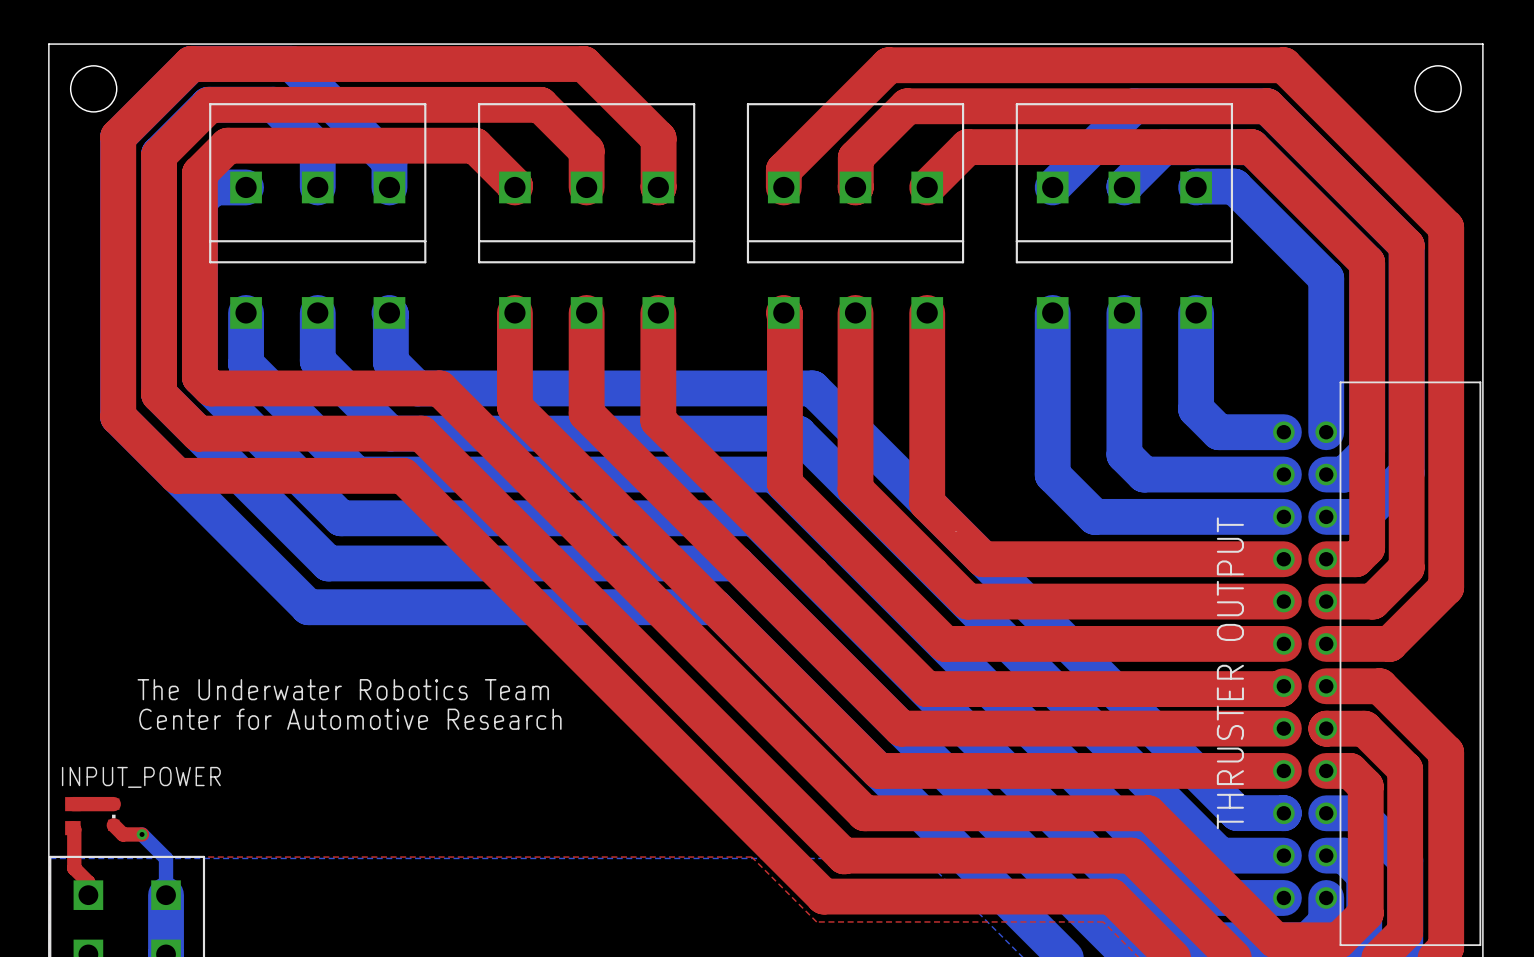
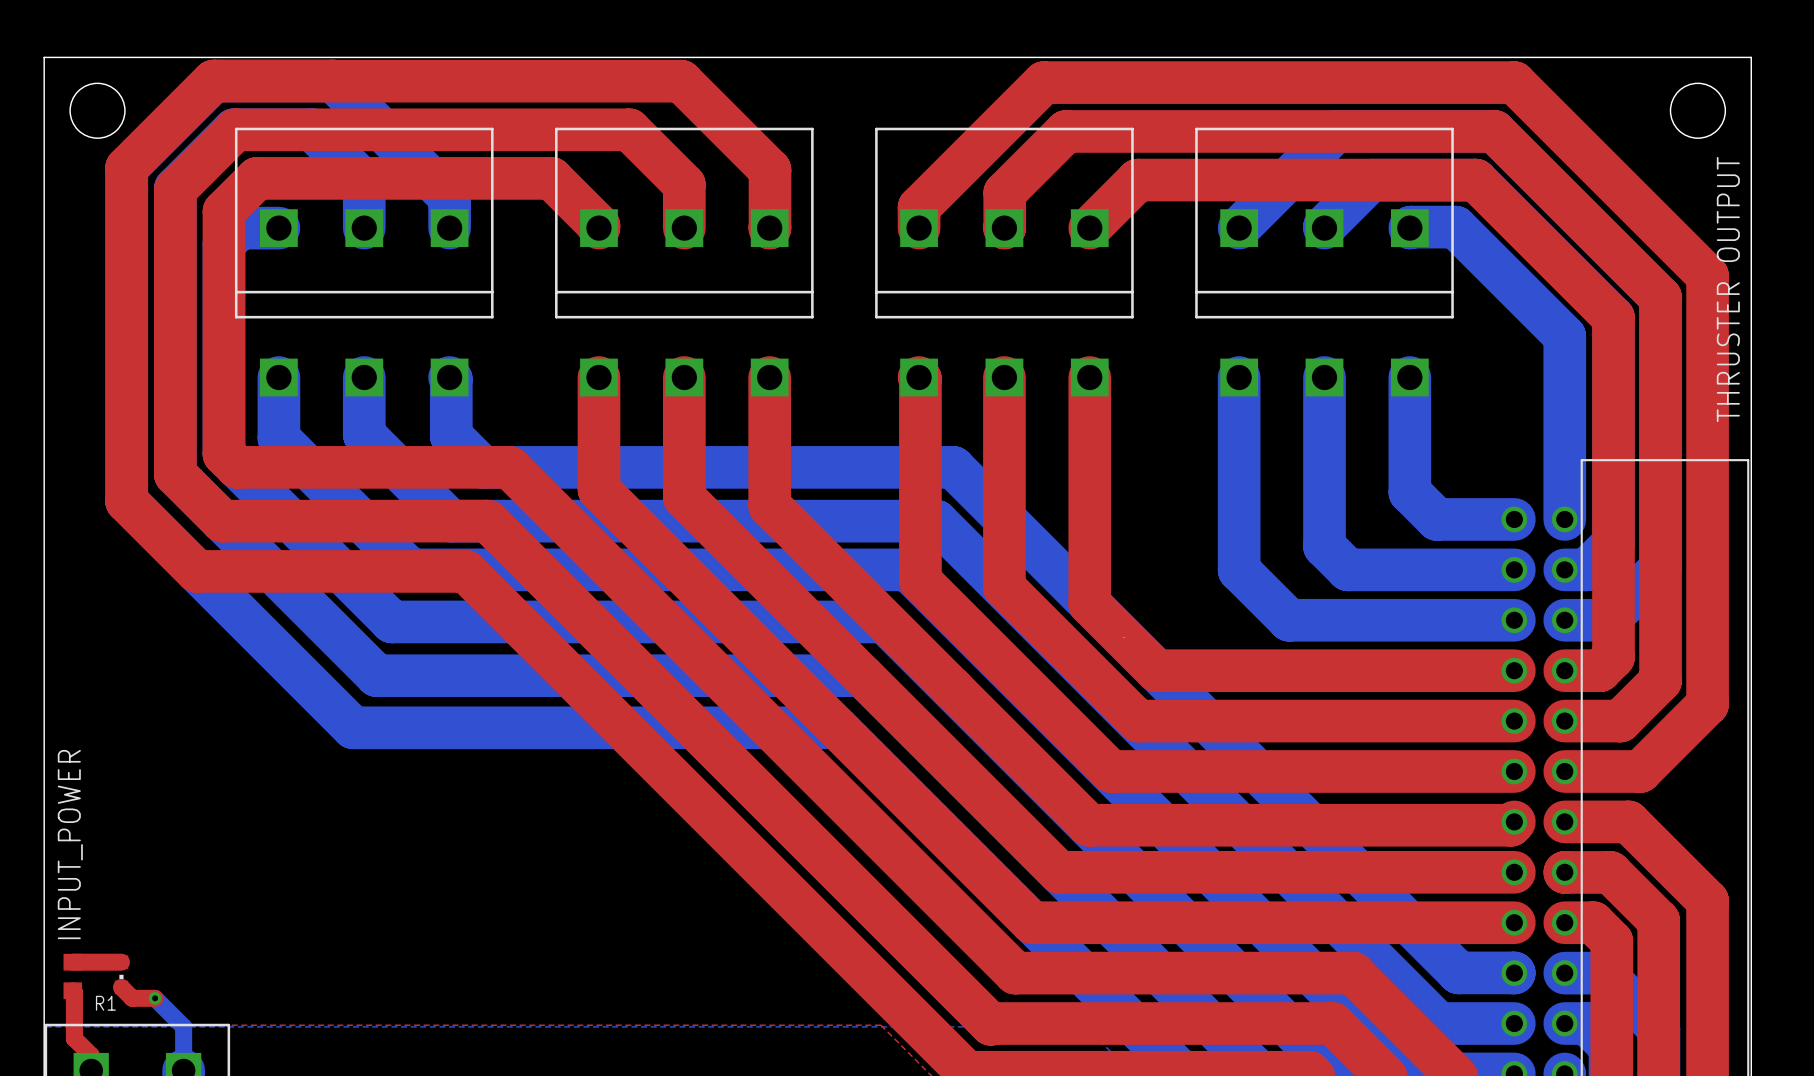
text: none -> THRUSTER OUTPUT (1728, 289)
text: THRUSTER OUTPUT (1230, 673) -> none
text: The Underwater Robotics Team (343, 689) -> none
text: Center for Automotive Research (350, 719) -> none
INPUT_POWER name rotation: 0° (141, 777) -> 90° counterclockwise (70, 844)
text: none -> R1 (105, 1003)

